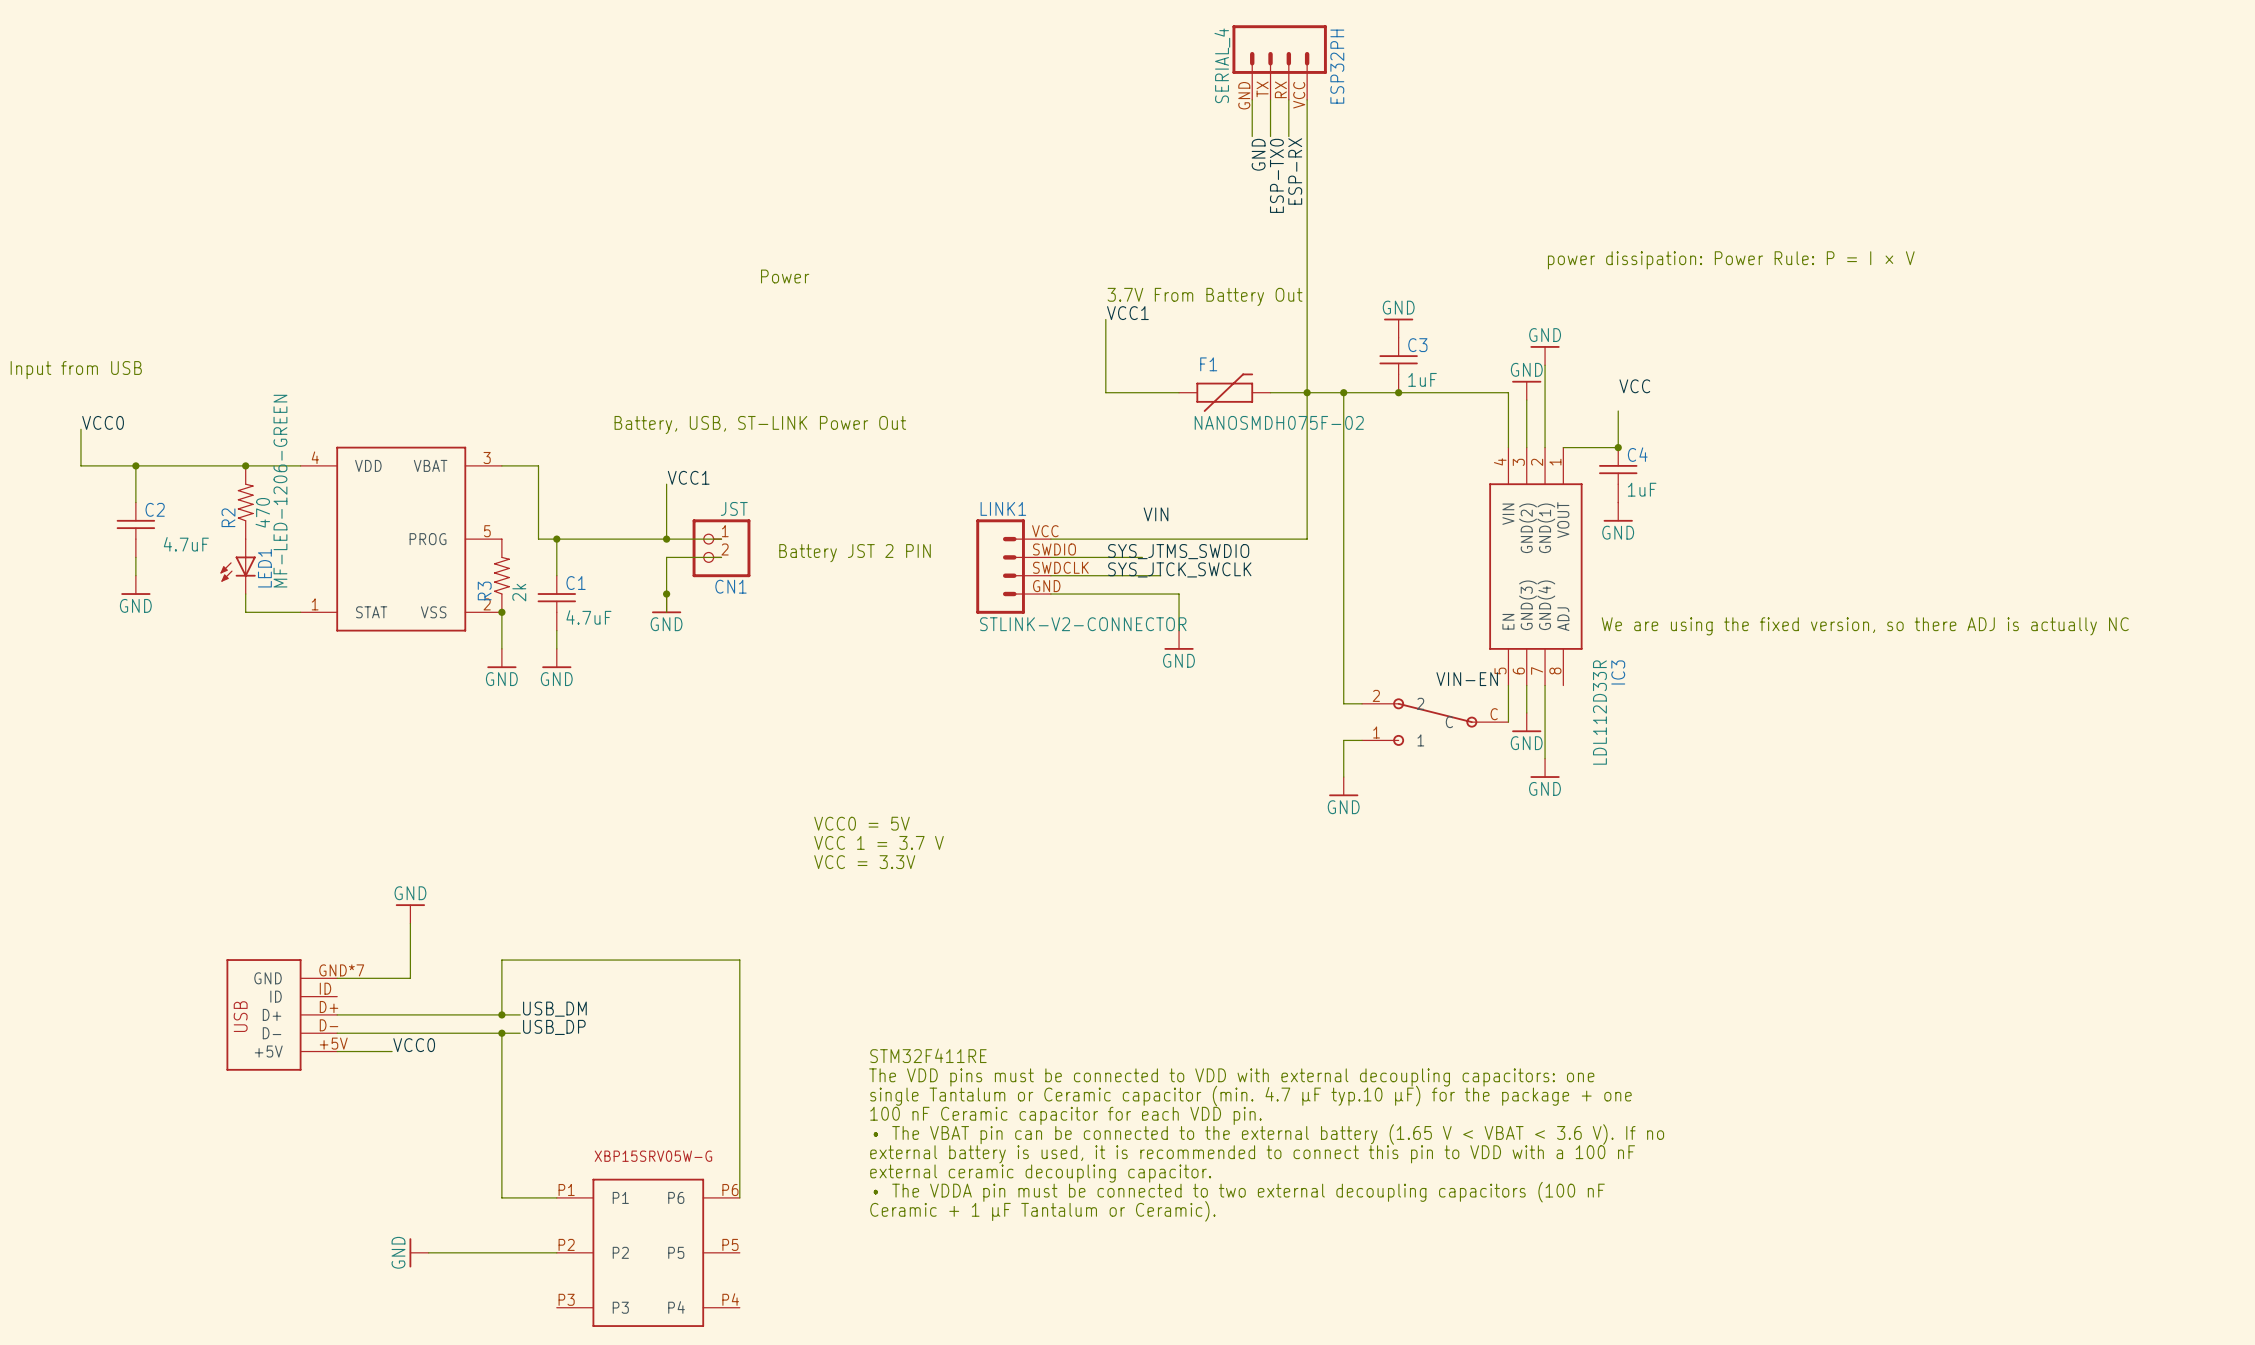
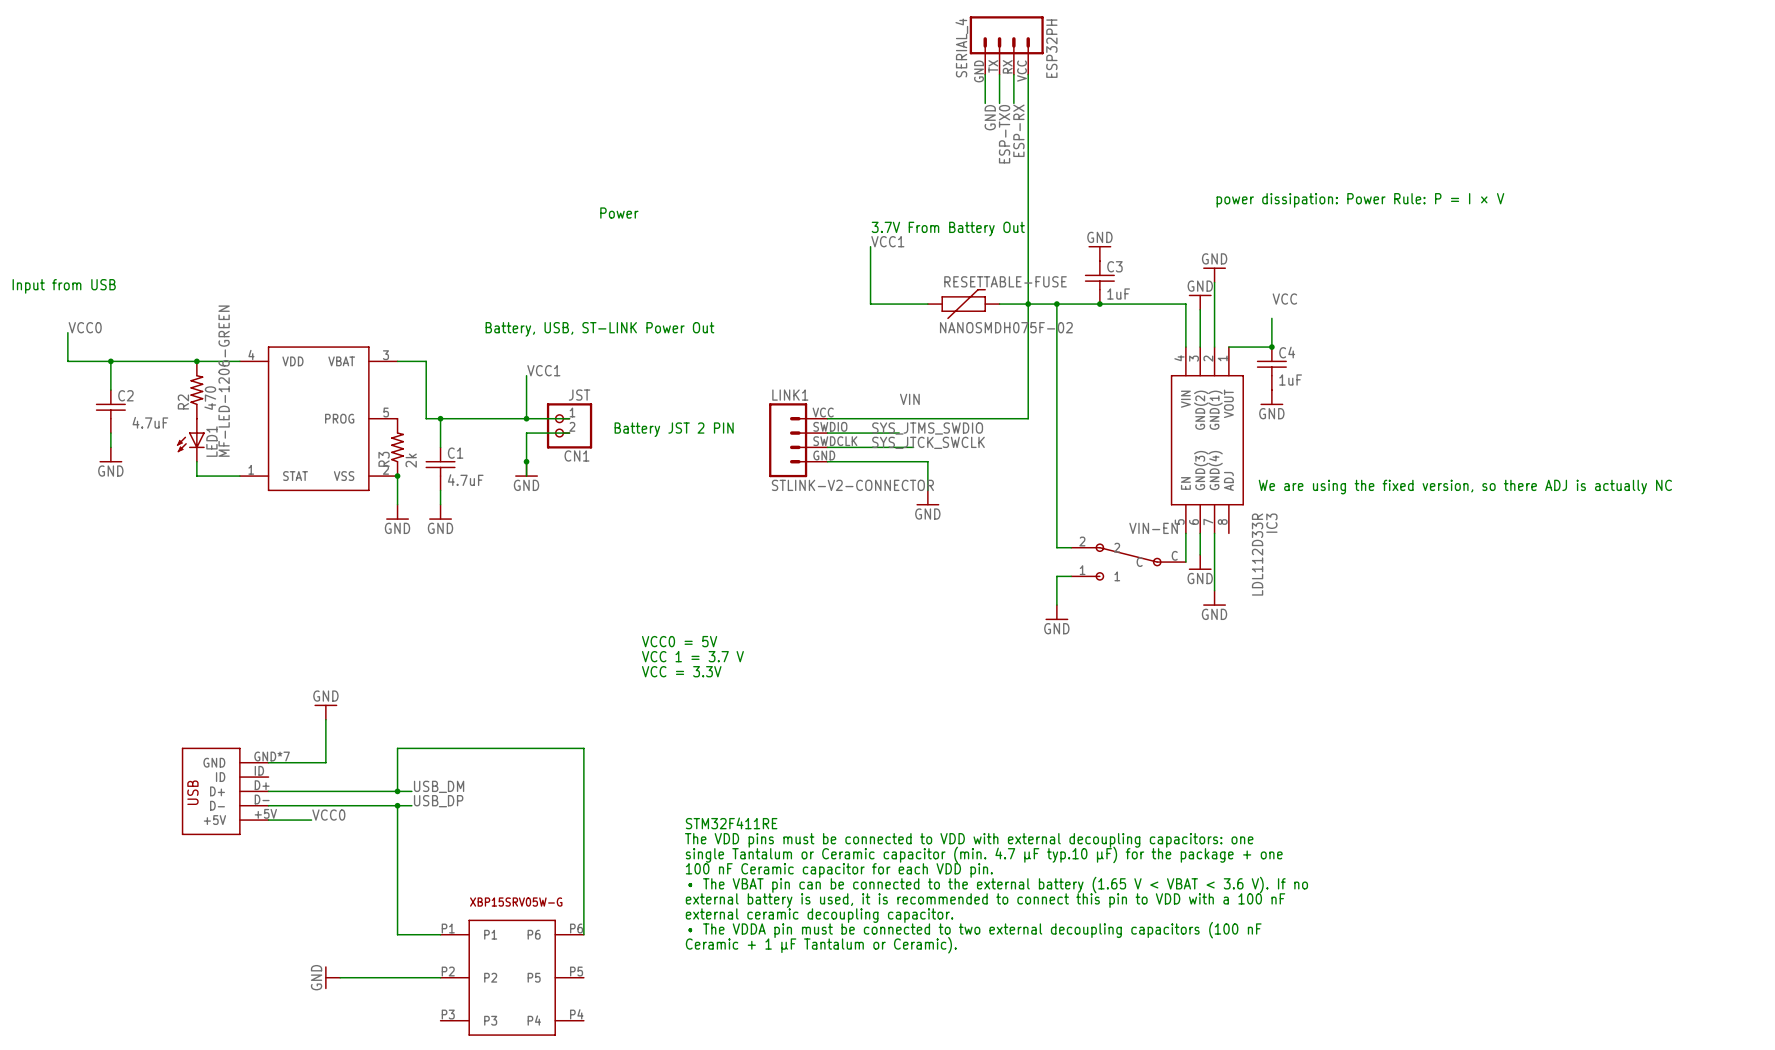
F1 name: F1 (1208, 364) -> RESETTABLE-FUSE (1005, 281)

